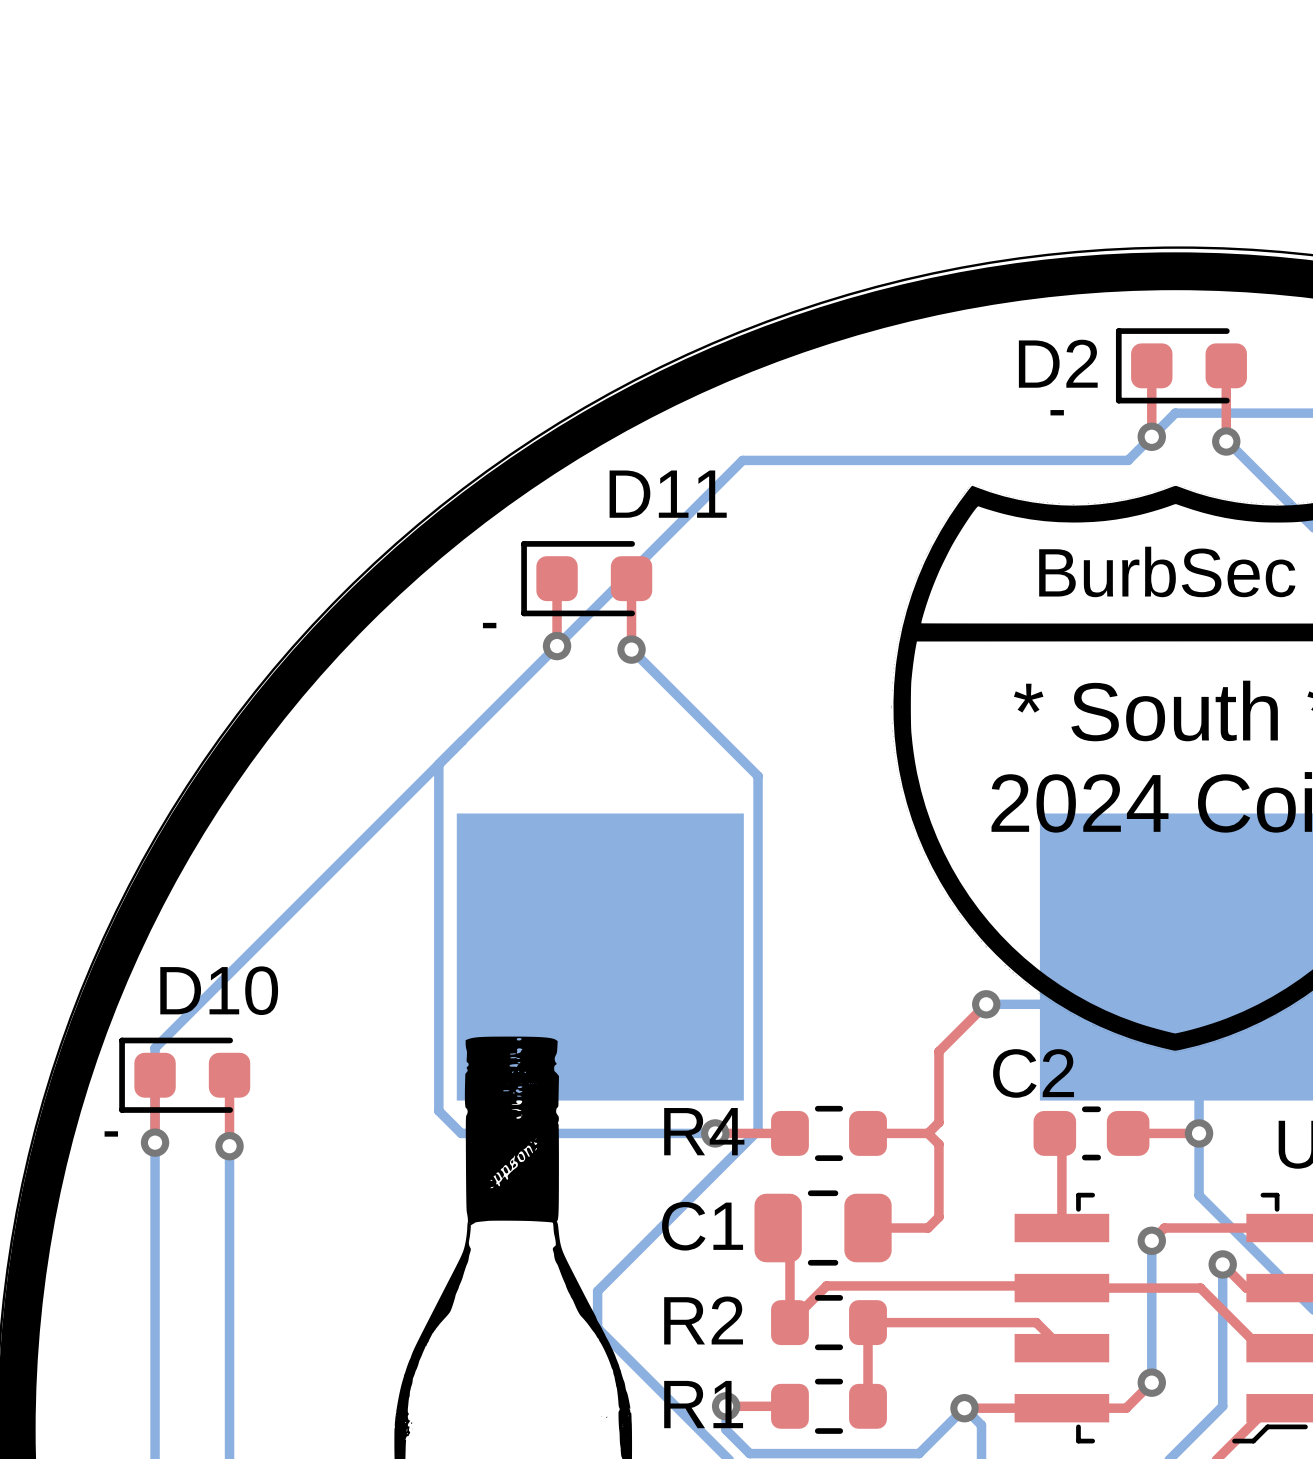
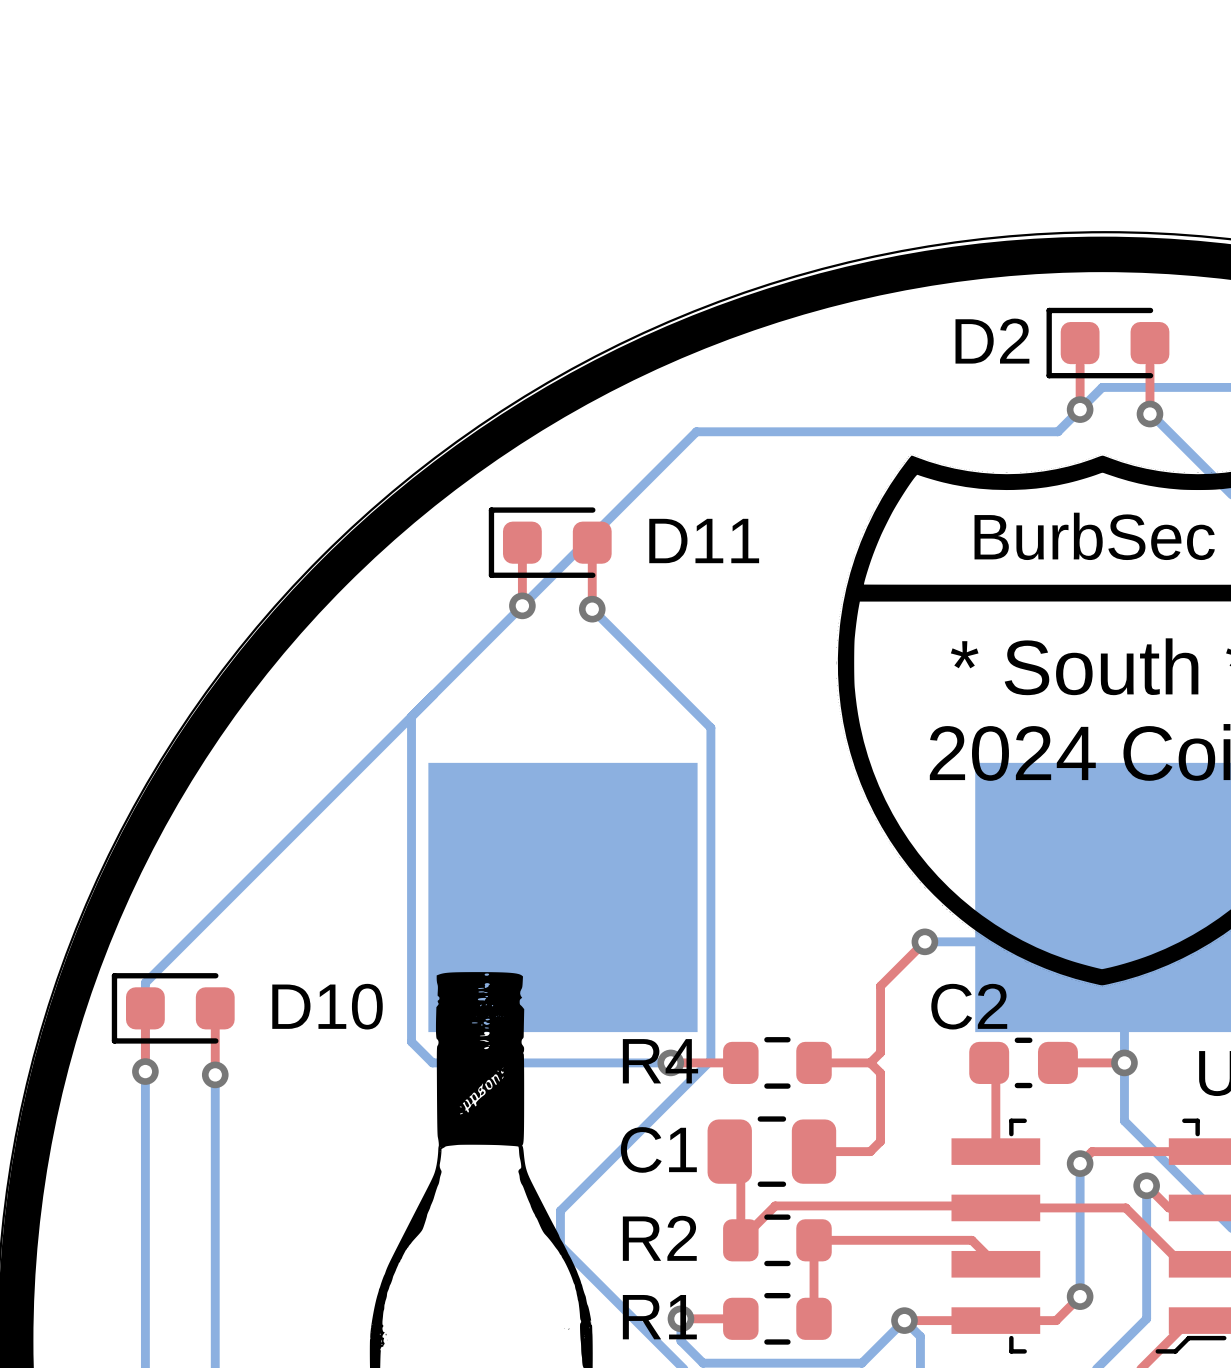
text: - (1057, 412) -> none
D11 name position: D11 (668, 494) -> D11 (704, 541)
text: - (489, 625) -> none
D10 name position: D10 (219, 990) -> D10 (327, 1006)
text: - (111, 1133) -> none

